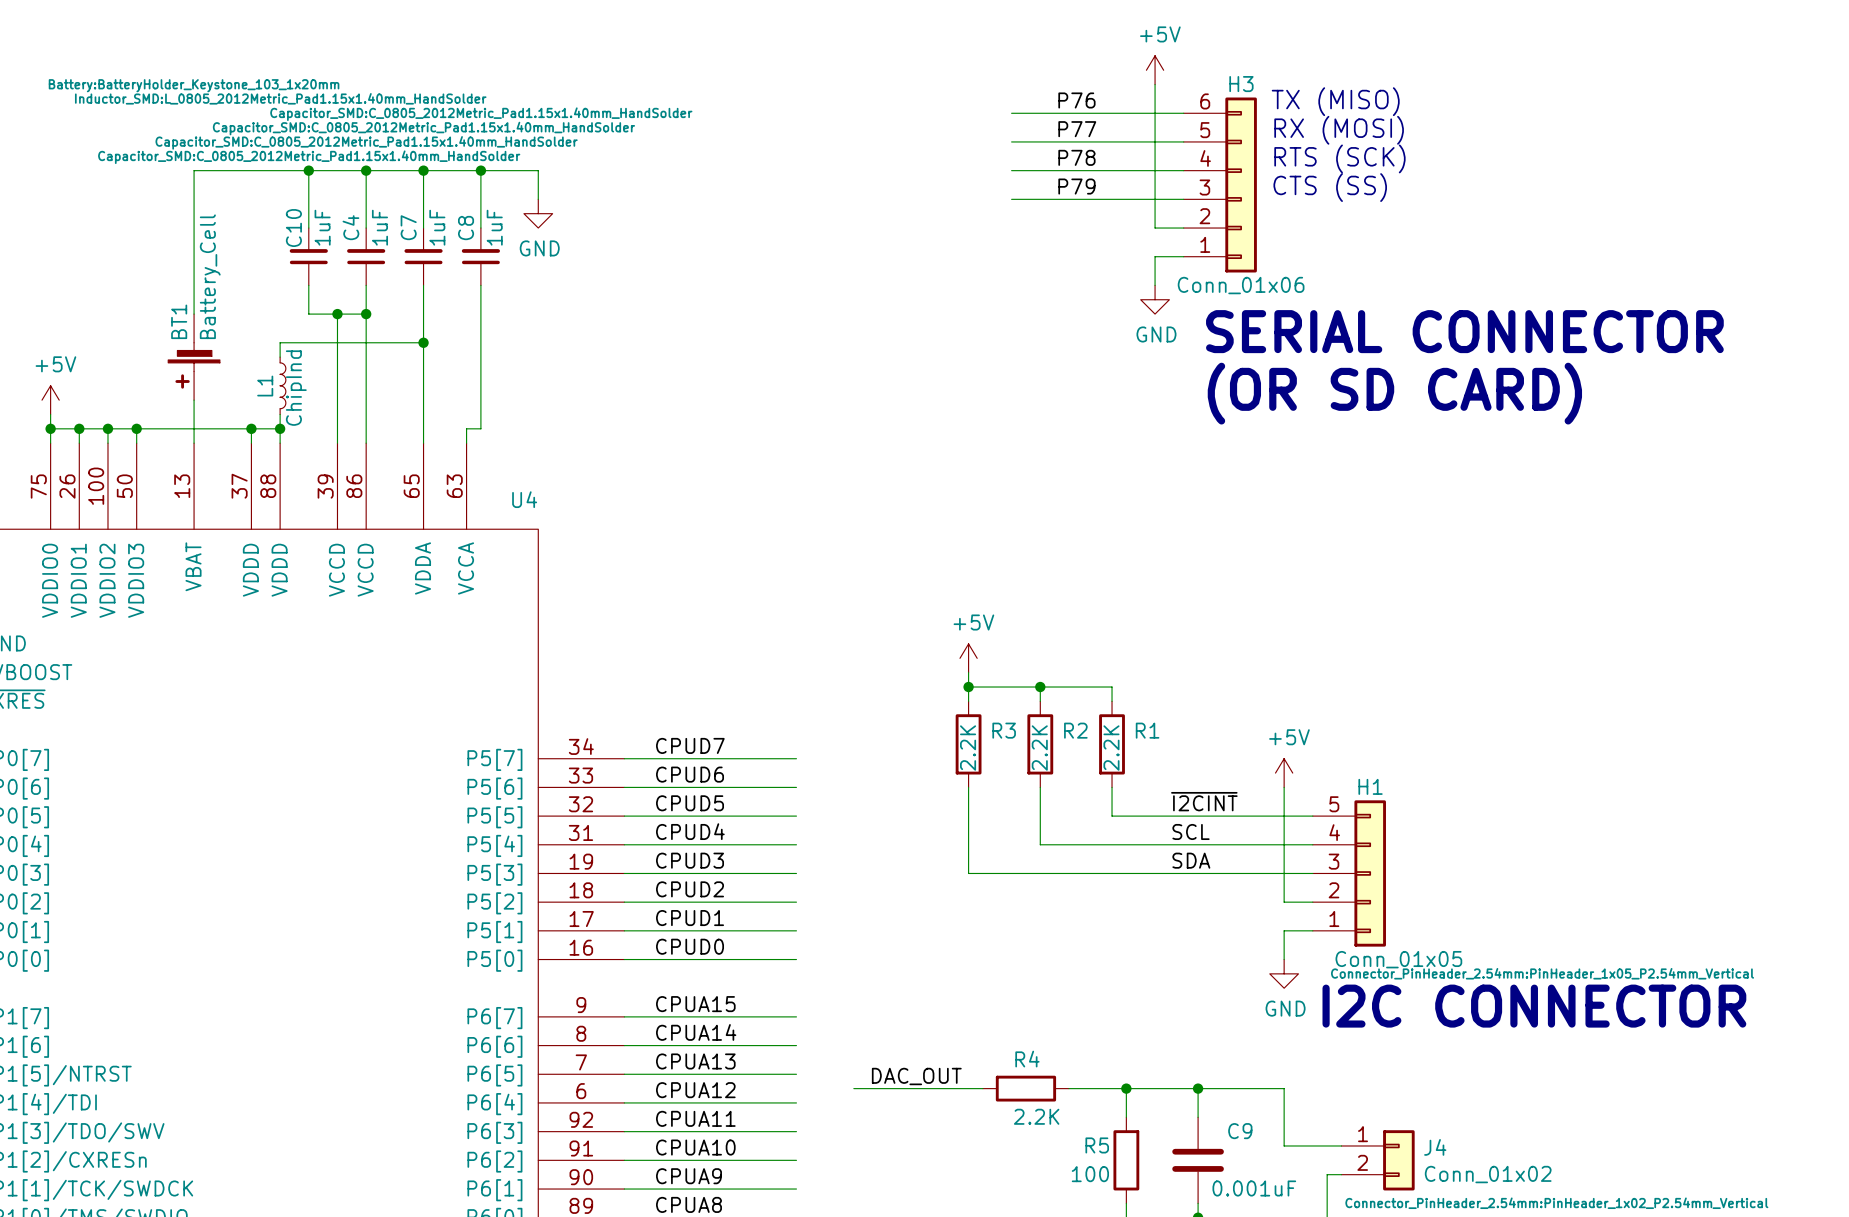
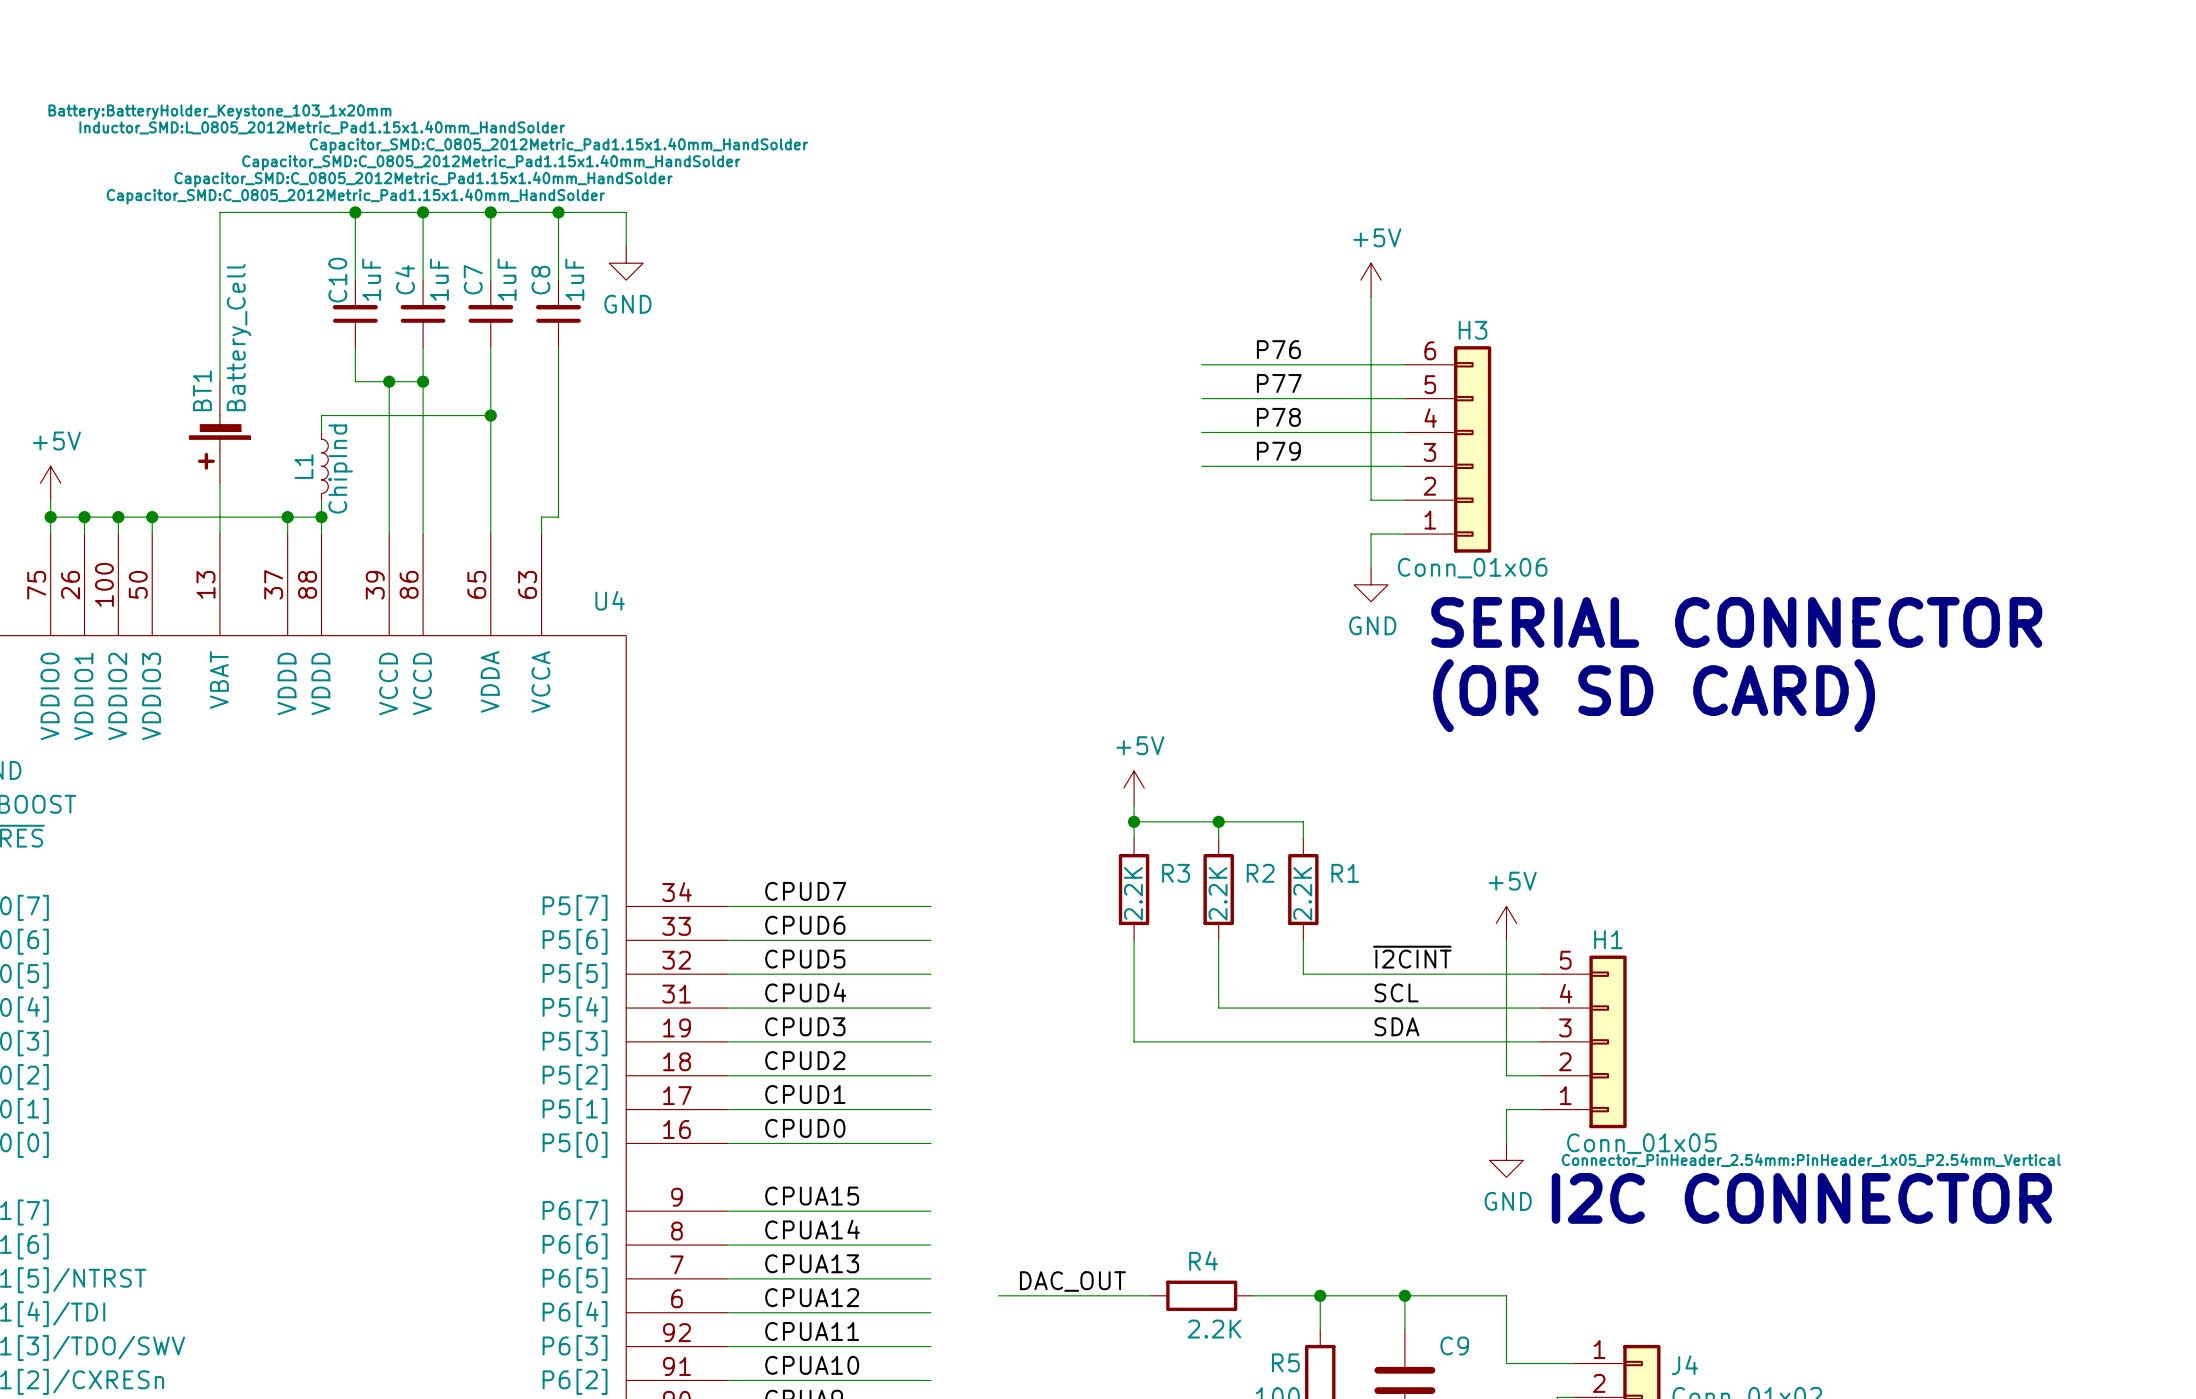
power symbol position: +5V (1155, 70) -> +5V (1371, 280)
wire: (1155, 84) (1155, 228) (1183, 228) -> none
label position: P76 (1076, 100) -> P76 (1278, 349)
text: TX (MISO) (1335, 101) -> none
wire: (1011, 113) (1183, 113) -> (1201, 364) (1404, 364)
label position: P77 (1077, 129) -> P77 (1279, 383)
text: RX (MOSI) (1339, 130) -> none
wire: (1011, 141) (1183, 141) -> (1201, 398) (1404, 398)
label position: P78 (1076, 157) -> P78 (1278, 417)
text: RTS (SCK) (1339, 158) -> none
wire: (1011, 170) (1183, 170) -> (1201, 432) (1404, 432)
H3 position: (1220, 184) -> (1448, 449)
label position: P79 (1076, 186) -> P79 (1278, 451)
text: CTS (SS) (1330, 187) -> none
wire: (1011, 199) (1183, 199) -> (1201, 466) (1404, 466)
wire: none -> (1371, 297) (1371, 500) (1404, 500)
wire: (1183, 256) (1155, 256) (1155, 285) -> (1404, 534) (1371, 534) (1371, 567)
power symbol position: GND (1155, 299) -> GND (1371, 584)
text position: SERIAL CONNECTOR (1464, 331) -> SERIAL CONNECTOR (1736, 622)
text position: (OR SD CARD) (1394, 393) -> (OR SD CARD) (1654, 695)

